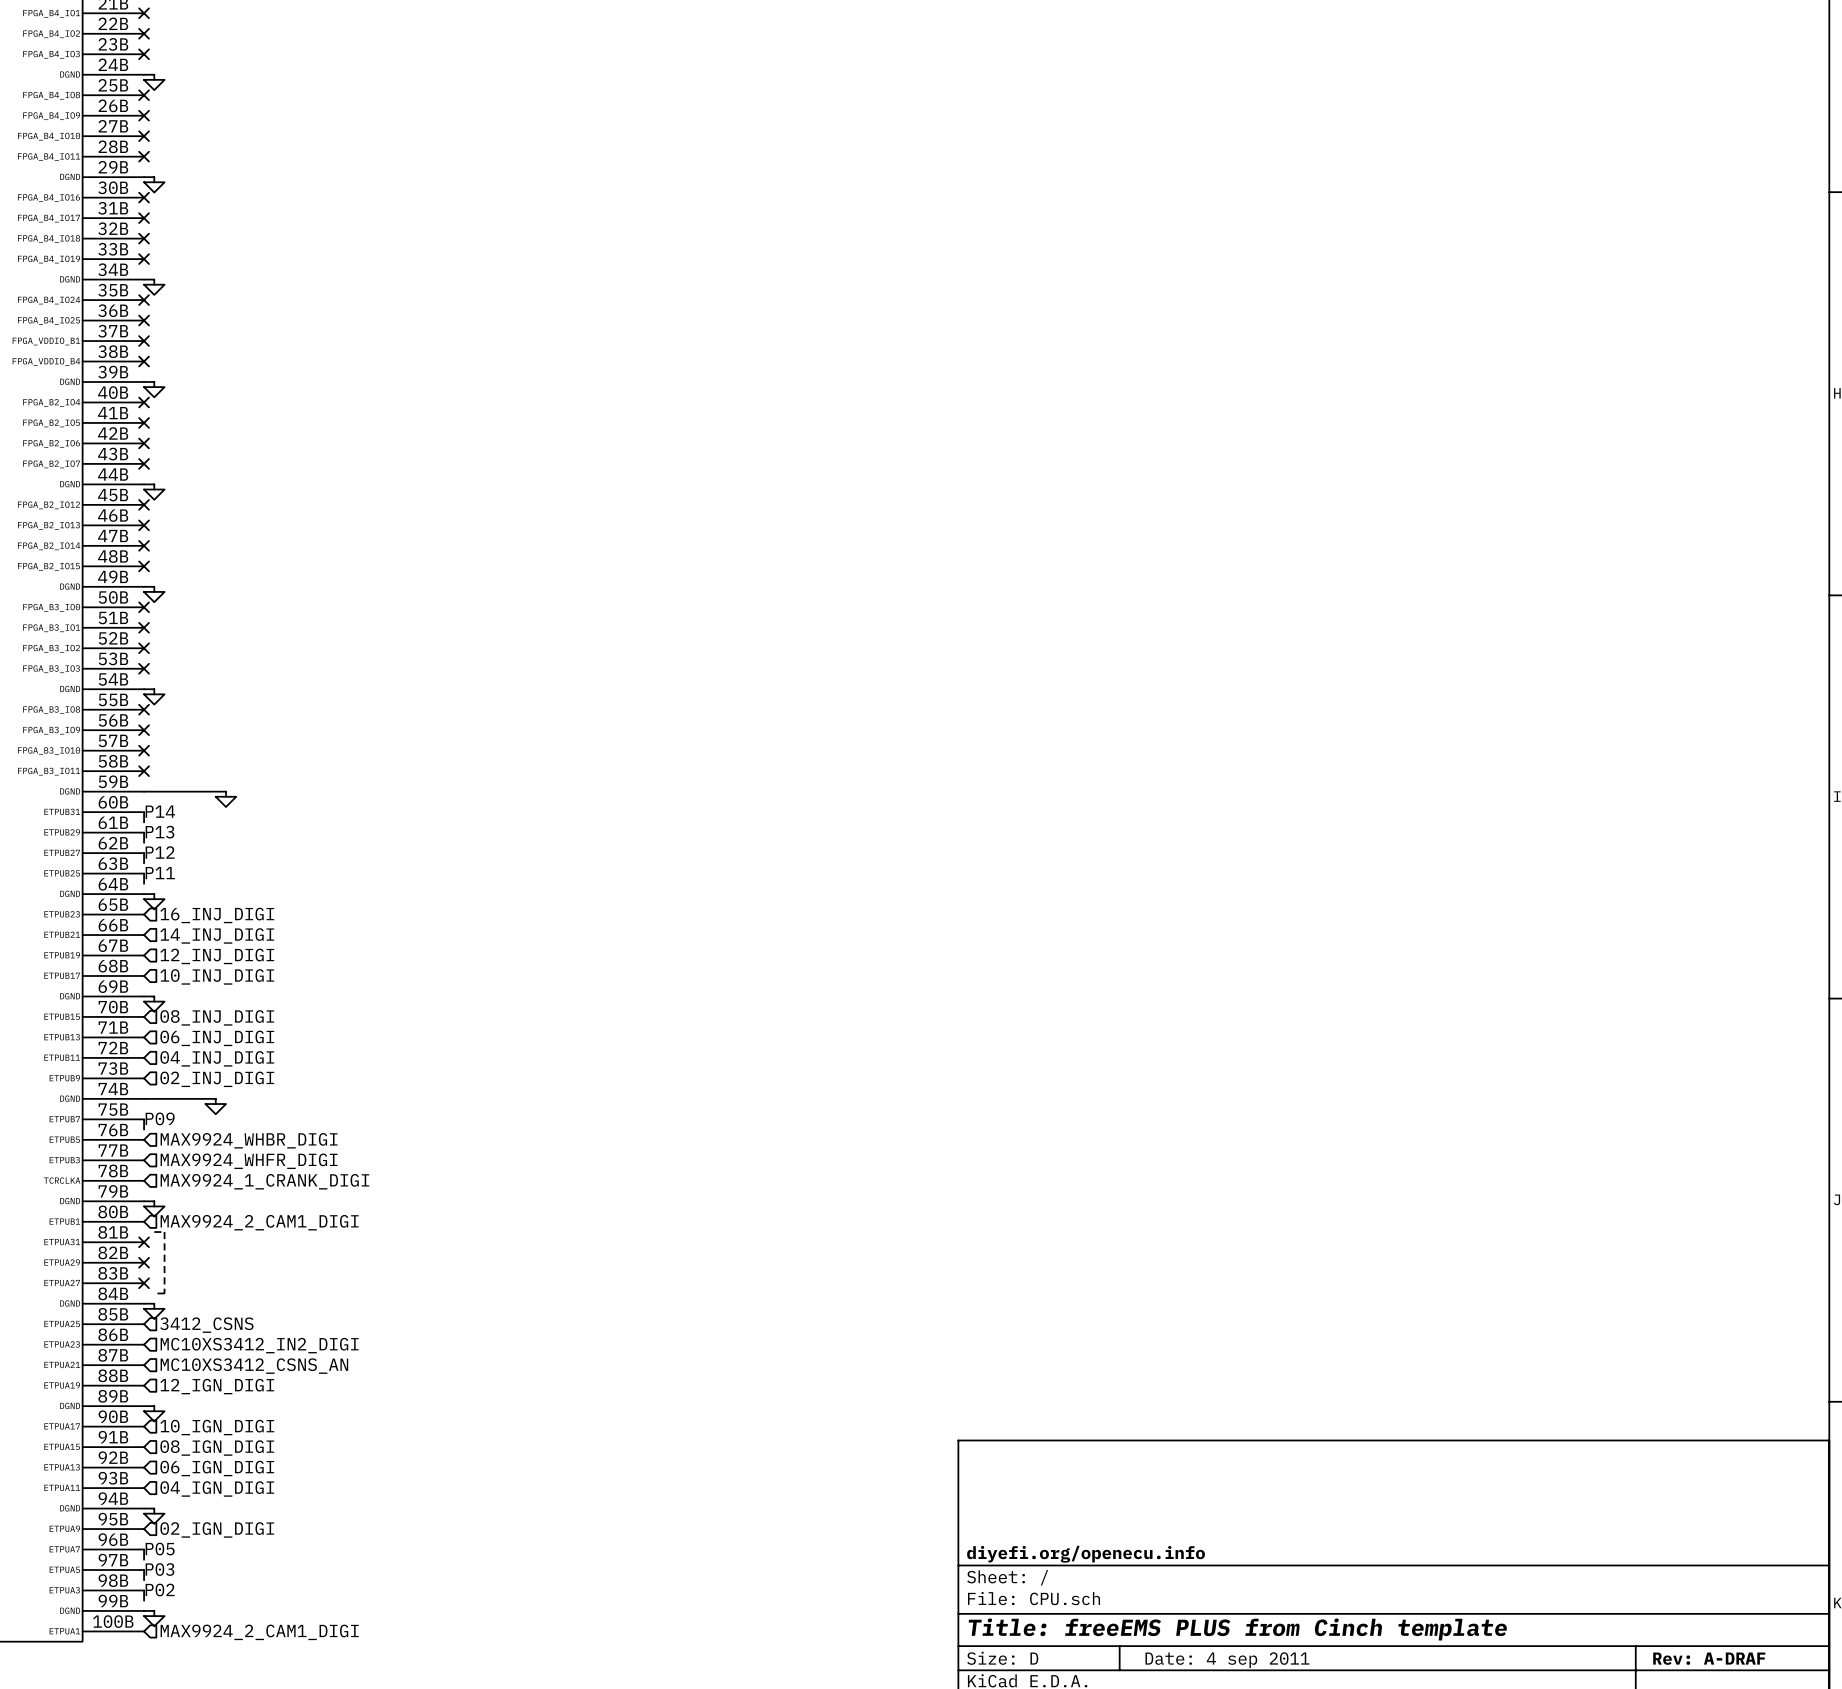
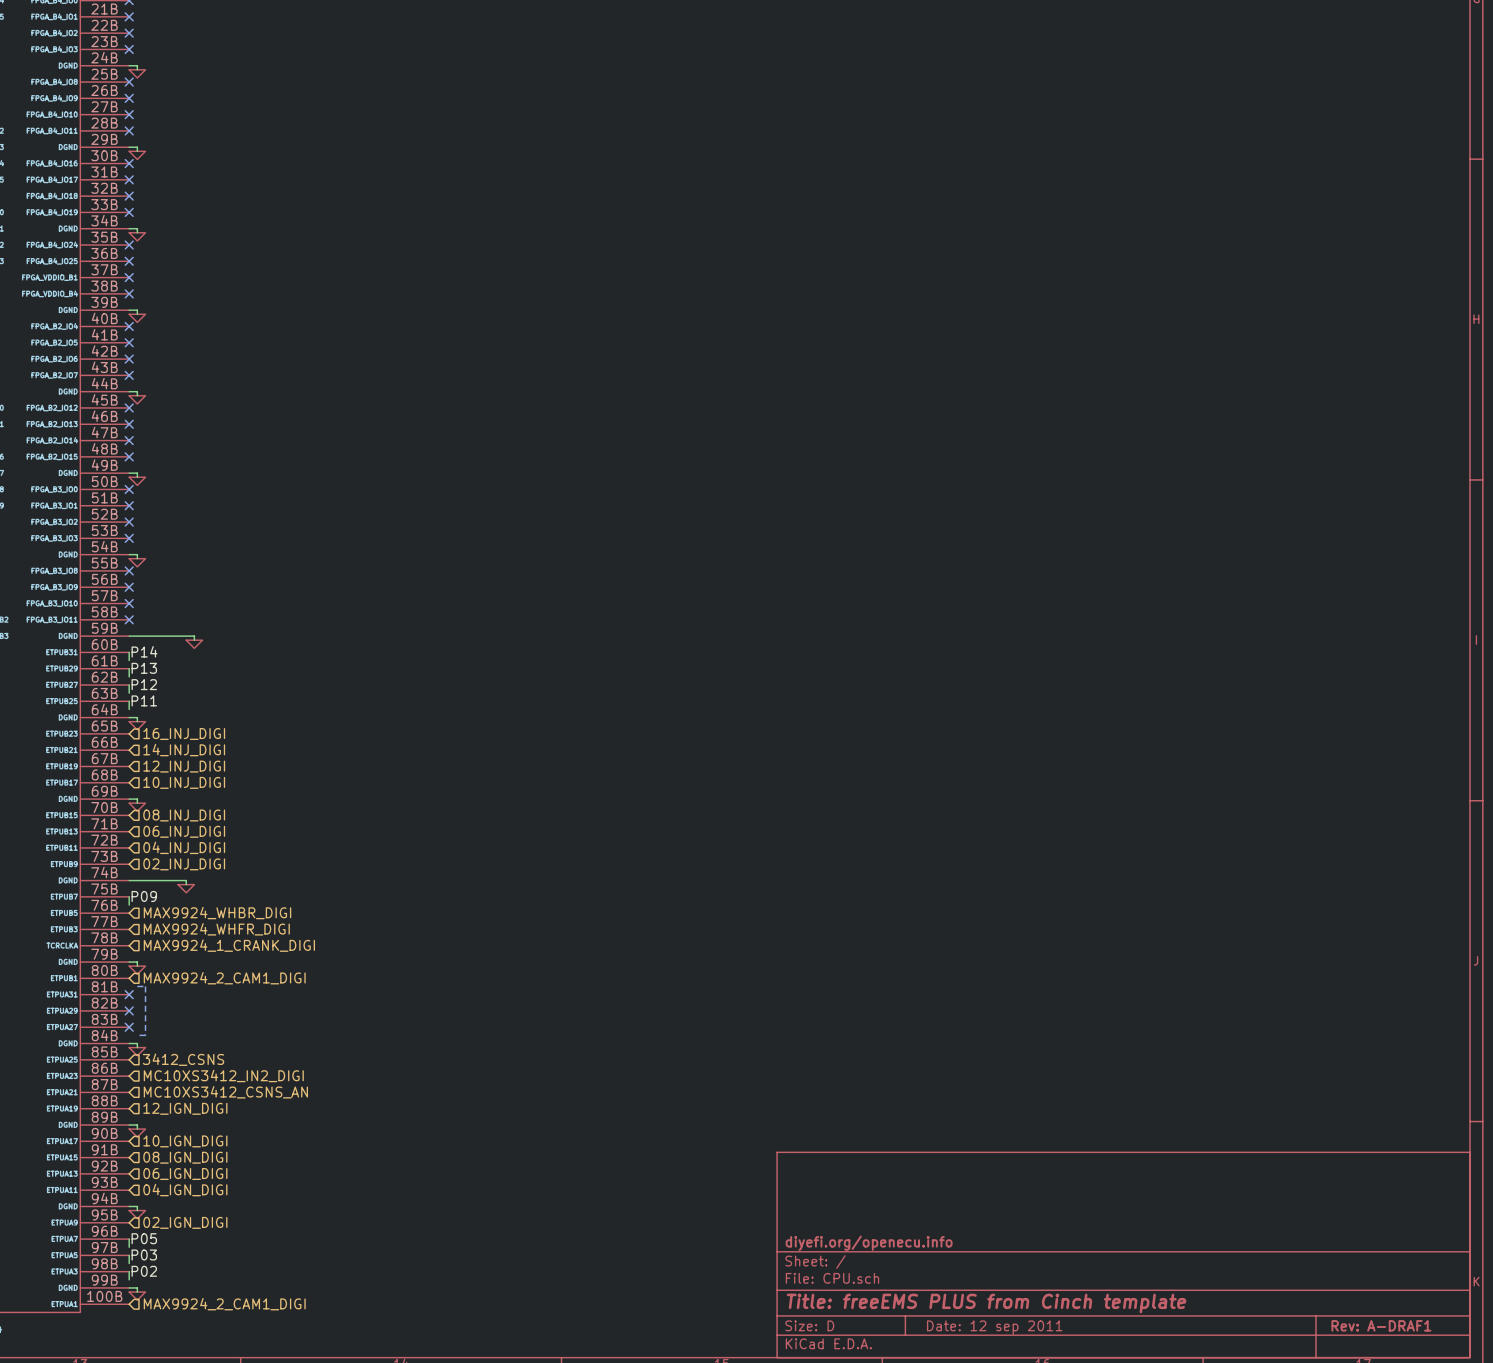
title block: Rev: A-DRAF (1709, 1658) -> Rev: A-DRAF1 (1381, 1325)
title block: Date: 4 sep 2011 (1227, 1660) -> Date: 12 sep 2011 (994, 1327)

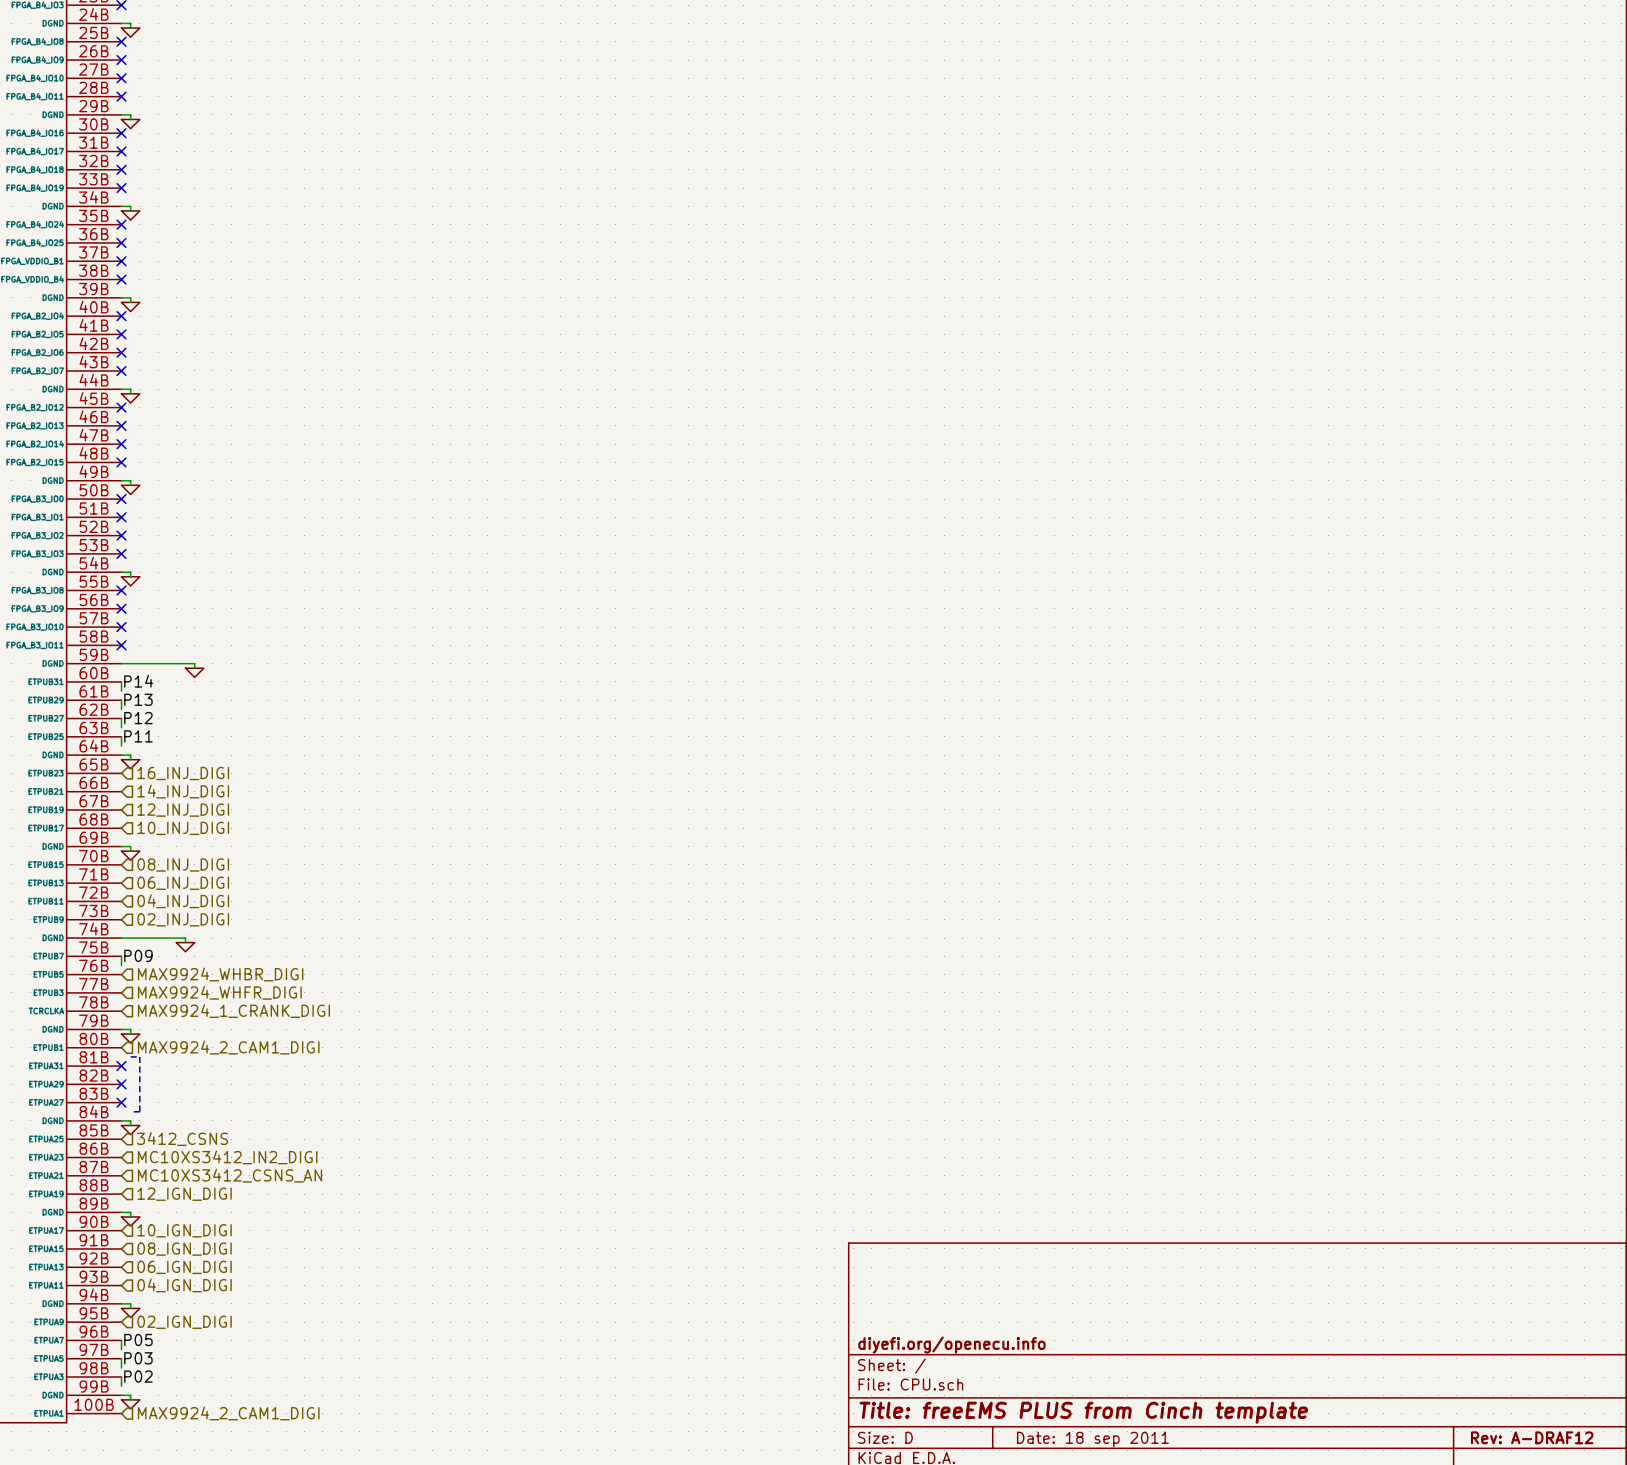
title block: Rev: A-DRAF1 (1381, 1325) -> Rev: A-DRAF12 (1532, 1437)
title block: Date: 12 sep 2011 (994, 1327) -> Date: 18 sep 2011 (1092, 1439)

